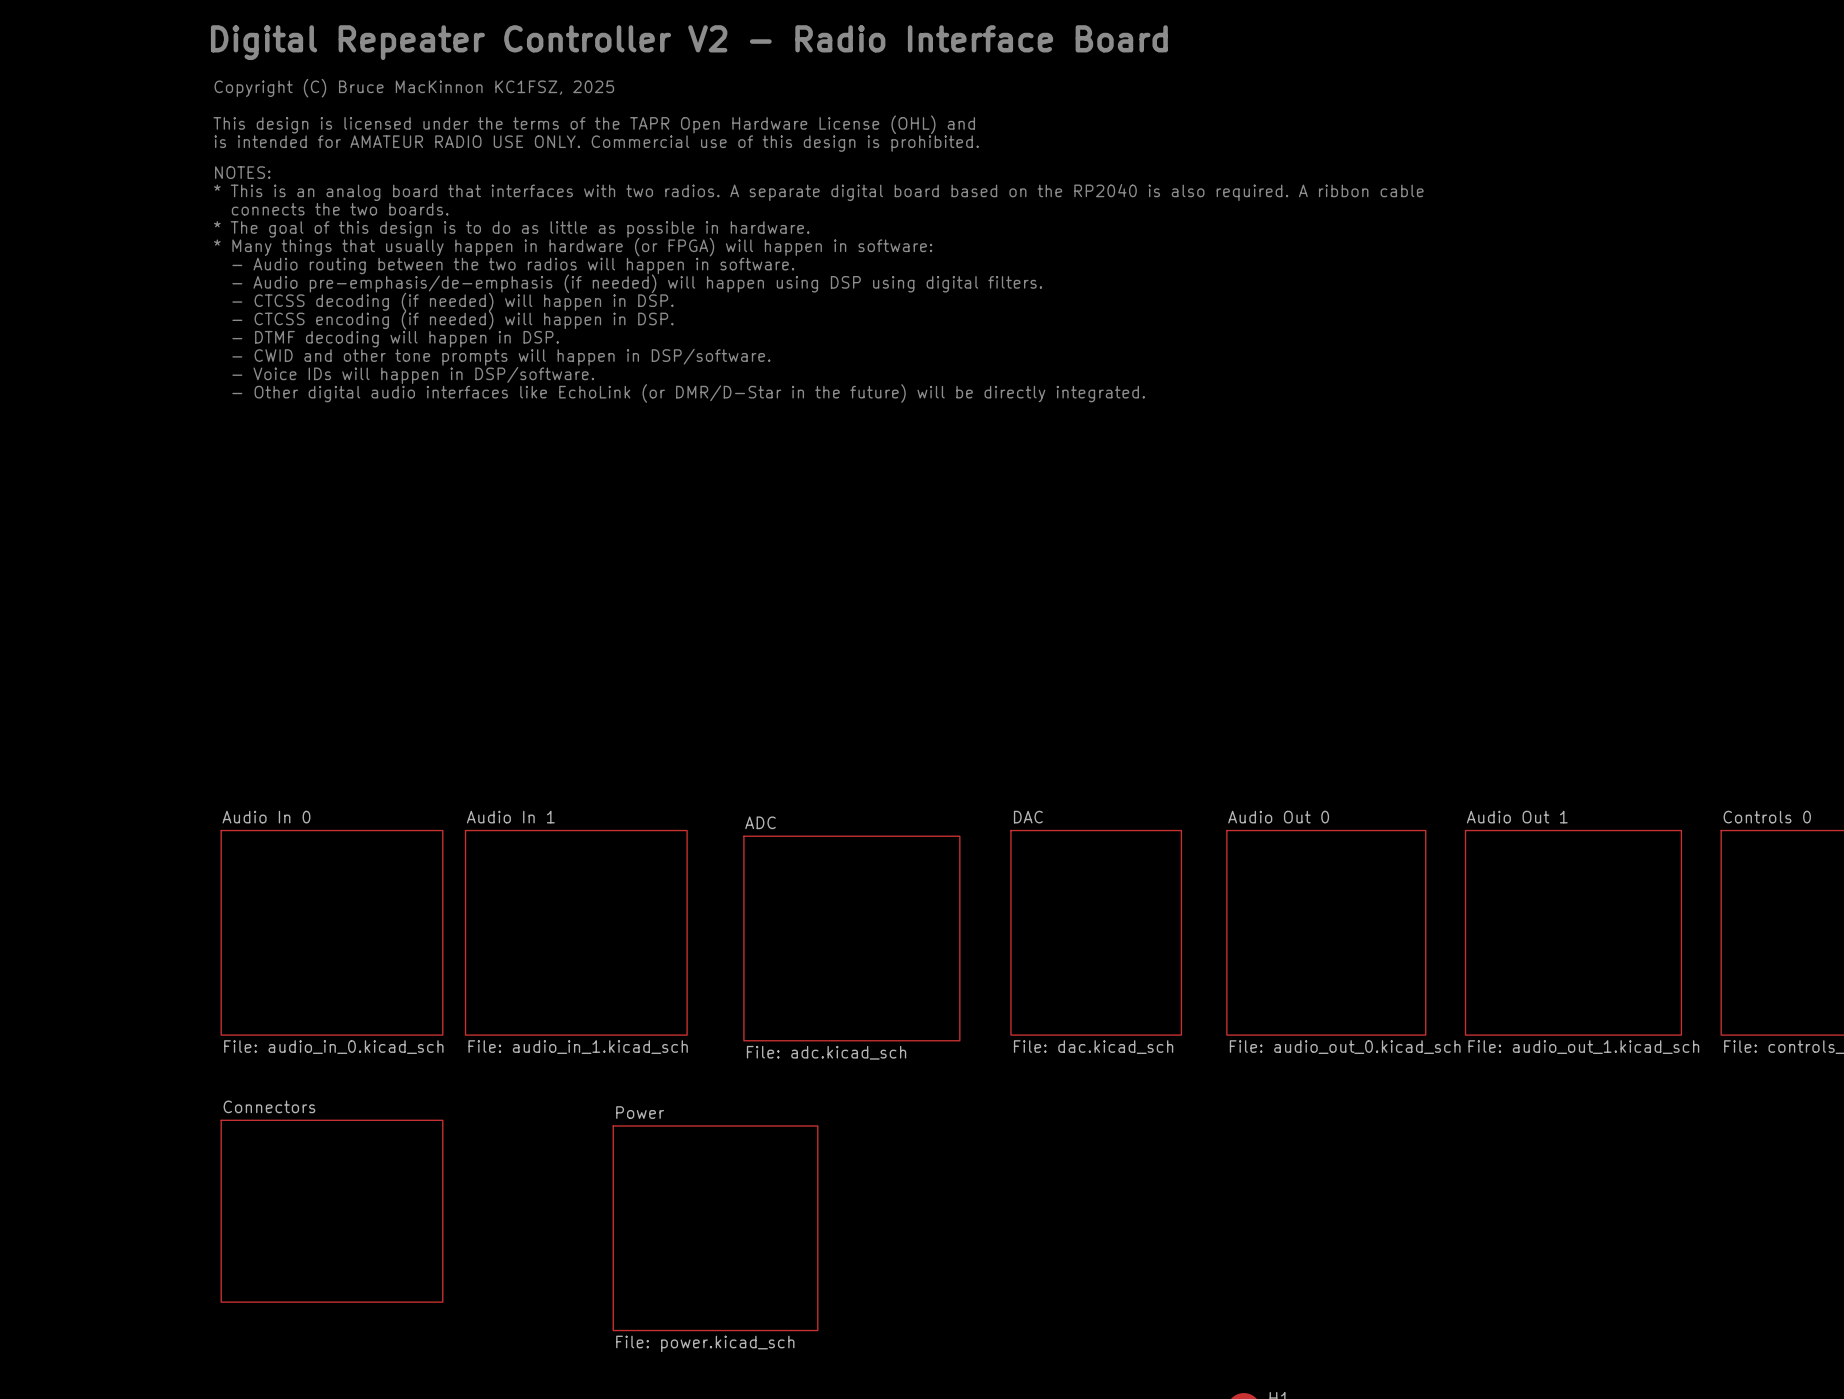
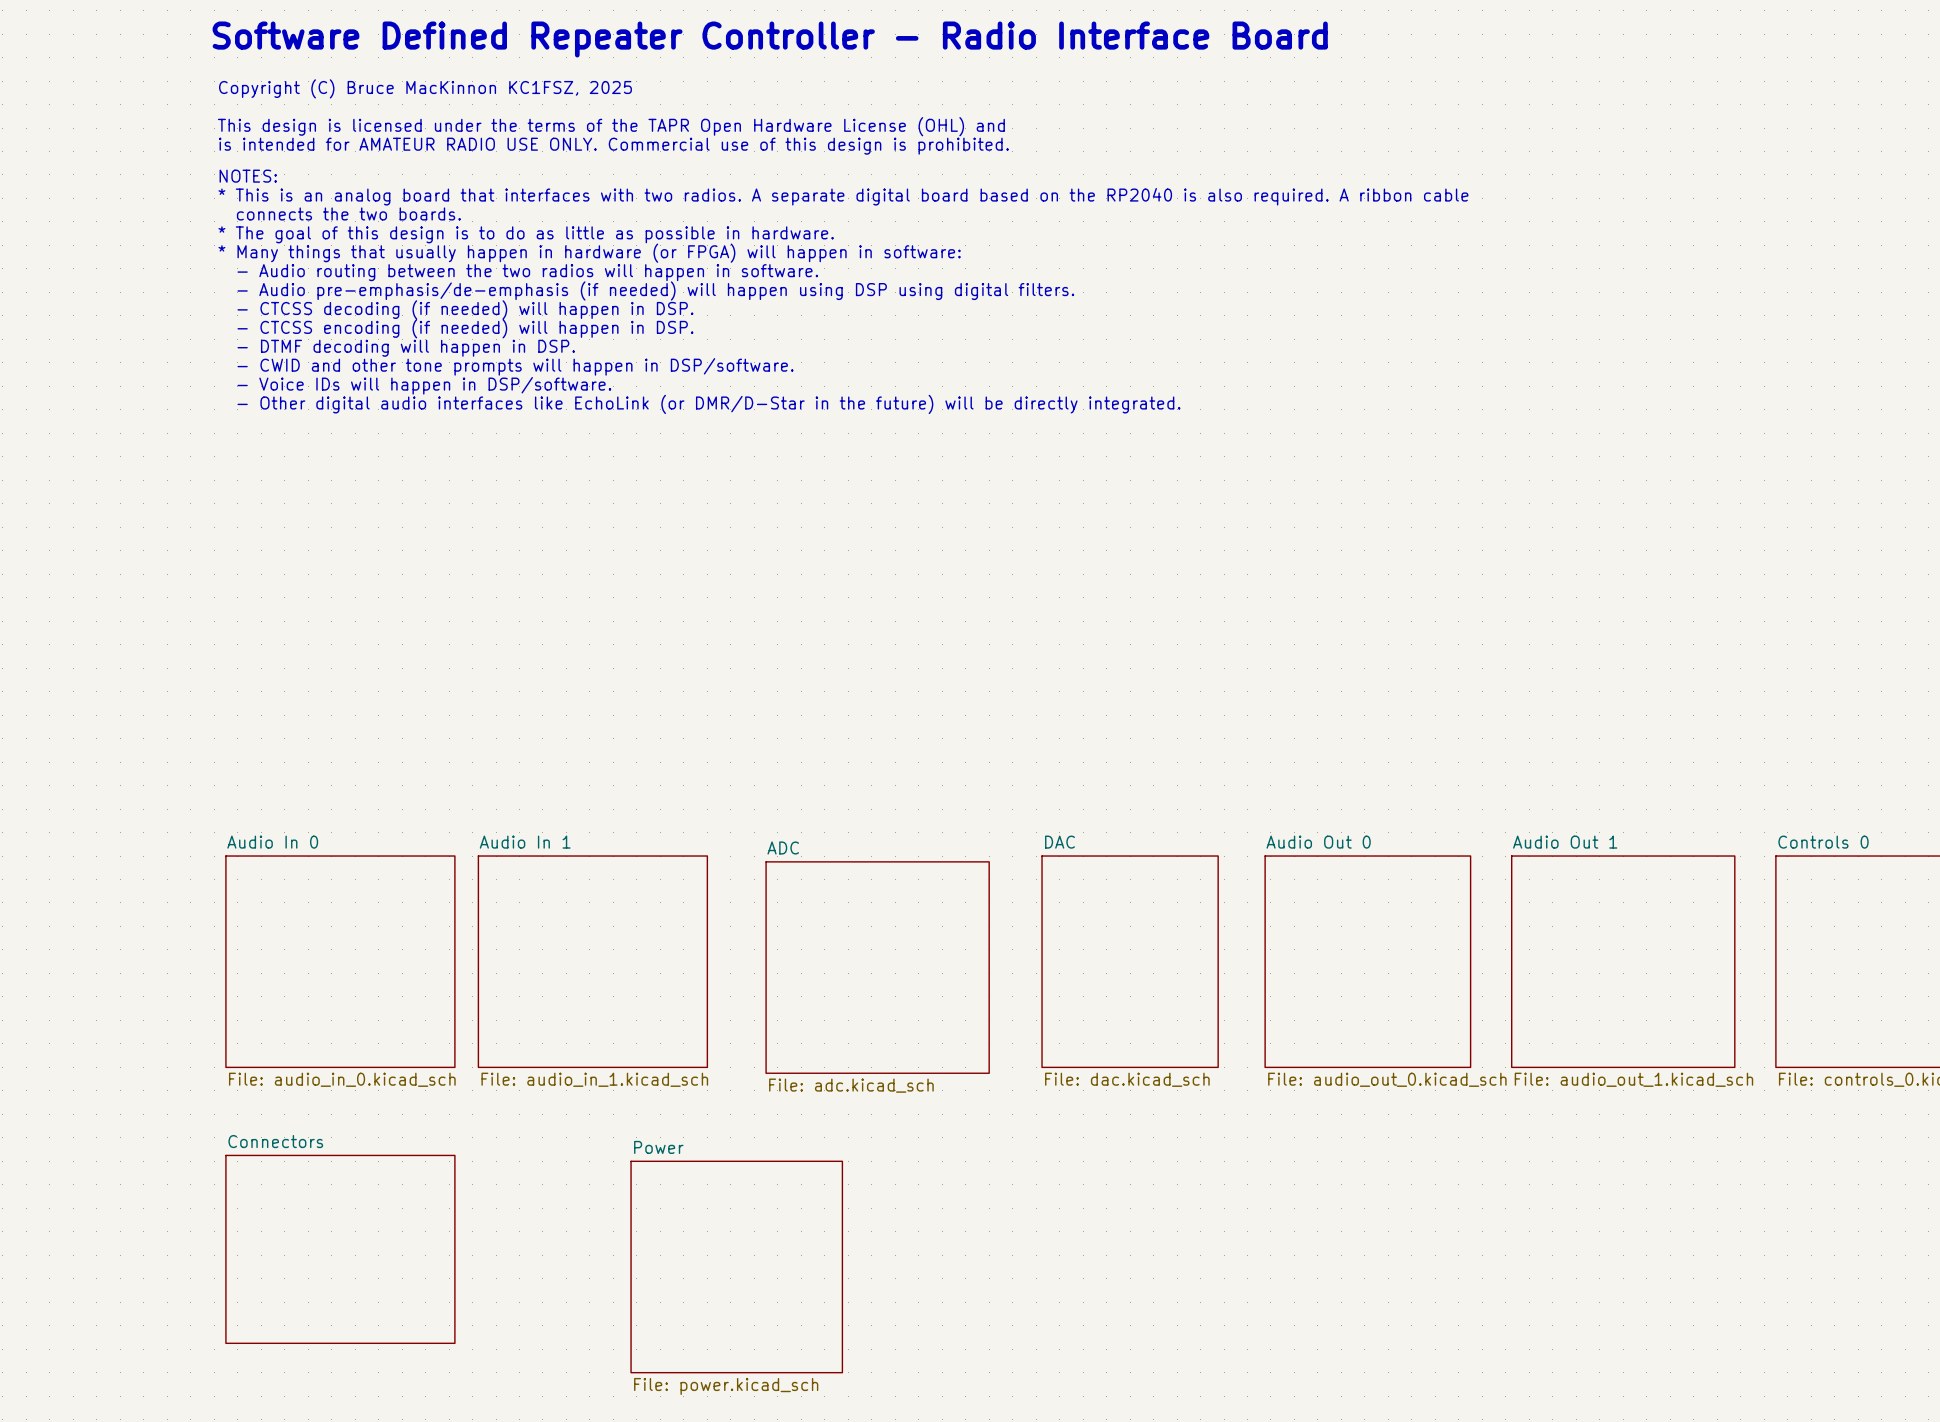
text: Digital Repeater Controller V2 - Radio Interface Board (689, 42) -> Software Defined Repeater Controller - Radio Interface Board (770, 39)

